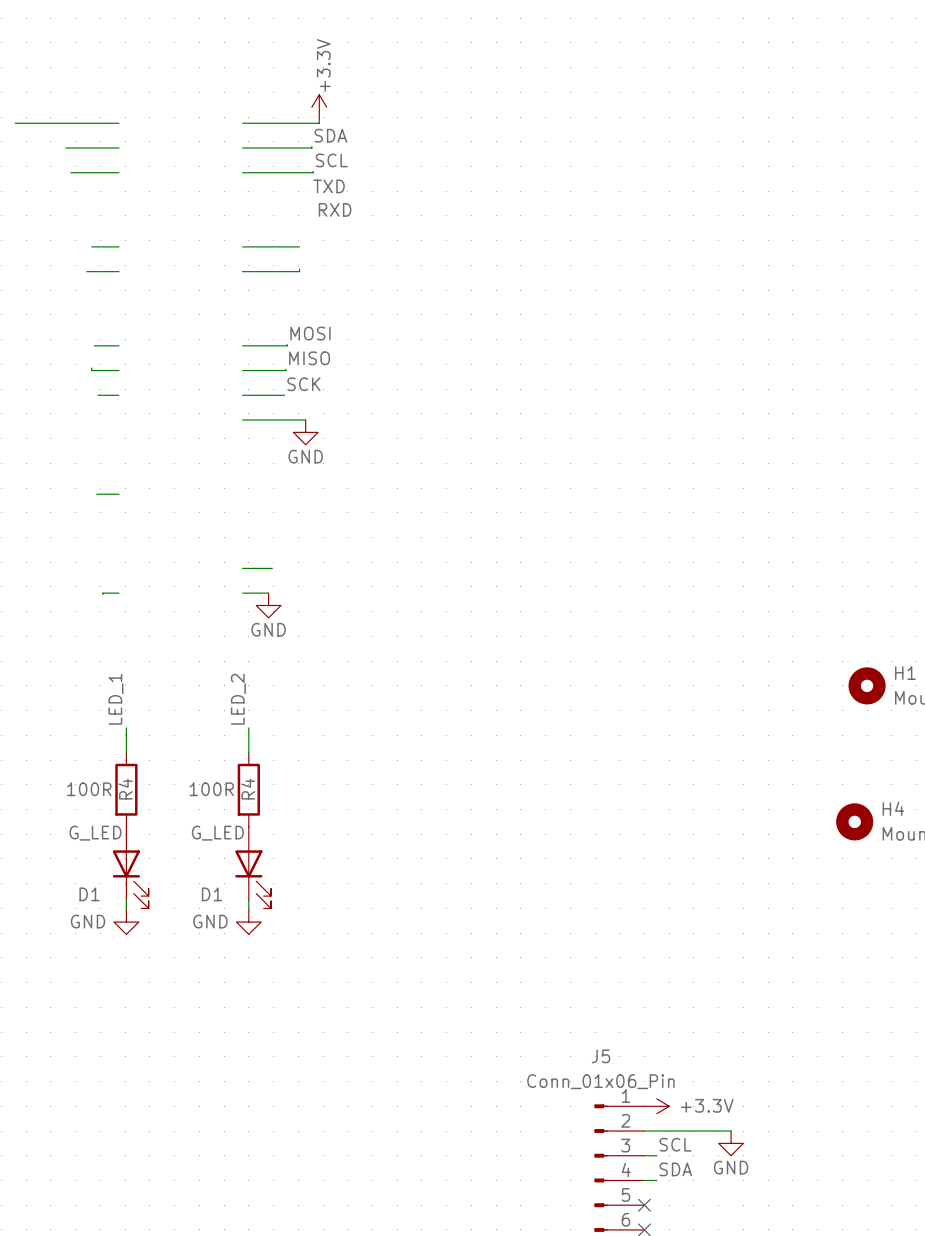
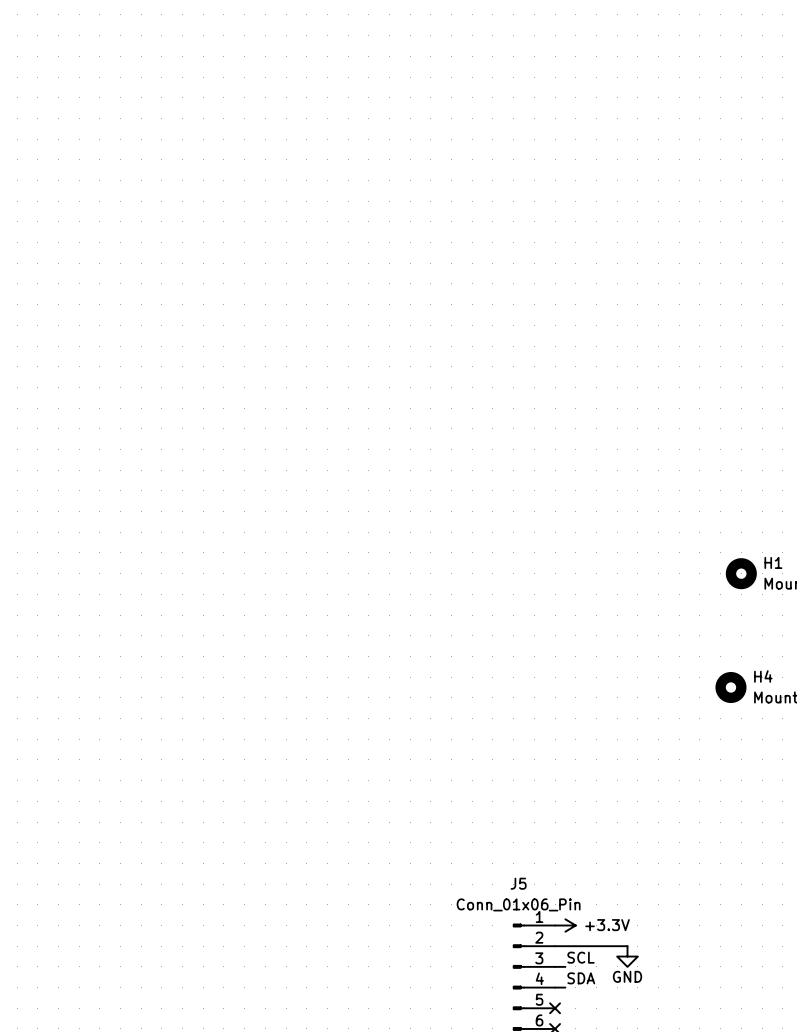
power symbol: +3.3V (319, 107) -> none
wire: (319, 119) (319, 123) (242, 123) -> none
wire: (15, 123) (118, 123) -> none
label: SDA (330, 135) -> none
wire: (311, 146) (242, 147) -> none
wire: (65, 147) (118, 147) -> none
label: SCL (331, 160) -> none
wire: (313, 171) (242, 172) -> none
wire: (70, 172) (118, 172) -> none
label: TXD (329, 186) -> none
label: RXD (335, 209) -> none
wire: (91, 246) (118, 246) -> none
wire: (242, 246) (299, 246) -> none
wire: (299, 269) (299, 271) (242, 271) -> none
wire: (86, 271) (118, 271) -> none
label: MOSI (310, 333) -> none
wire: (287, 344) (242, 345) -> none
wire: (94, 345) (118, 345) -> none
label: MISO (309, 358) -> none
wire: (91, 368) (91, 370) (118, 370) -> none
wire: (285, 369) (242, 370) -> none
label: SCK (303, 384) -> none
wire: (97, 395) (118, 395) -> none
wire: (242, 395) (284, 395) -> none
wire: (242, 420) (305, 420) -> none
power symbol: GND (305, 432) -> none
wire: (96, 494) (118, 494) -> none
wire: (242, 568) (272, 568) -> none
wire: (118, 593) (102, 594) -> none
wire: (242, 593) (268, 593) -> none
power symbol: GND (268, 605) -> none
label: LED_1 (115, 699) -> none
label: LED_2 (238, 699) -> none
wire: (126, 727) (126, 752) -> none
wire: (248, 727) (248, 752) -> none
R4: 100R (126, 789) -> none
R4: 100R (248, 789) -> none
D1: G_LED (130, 867) -> none
D1: G_LED (253, 867) -> none
wire: (126, 901) (126, 909) -> none
wire: (248, 901) (248, 909) -> none
power symbol: GND (126, 922) -> none
power symbol: GND (248, 922) -> none

